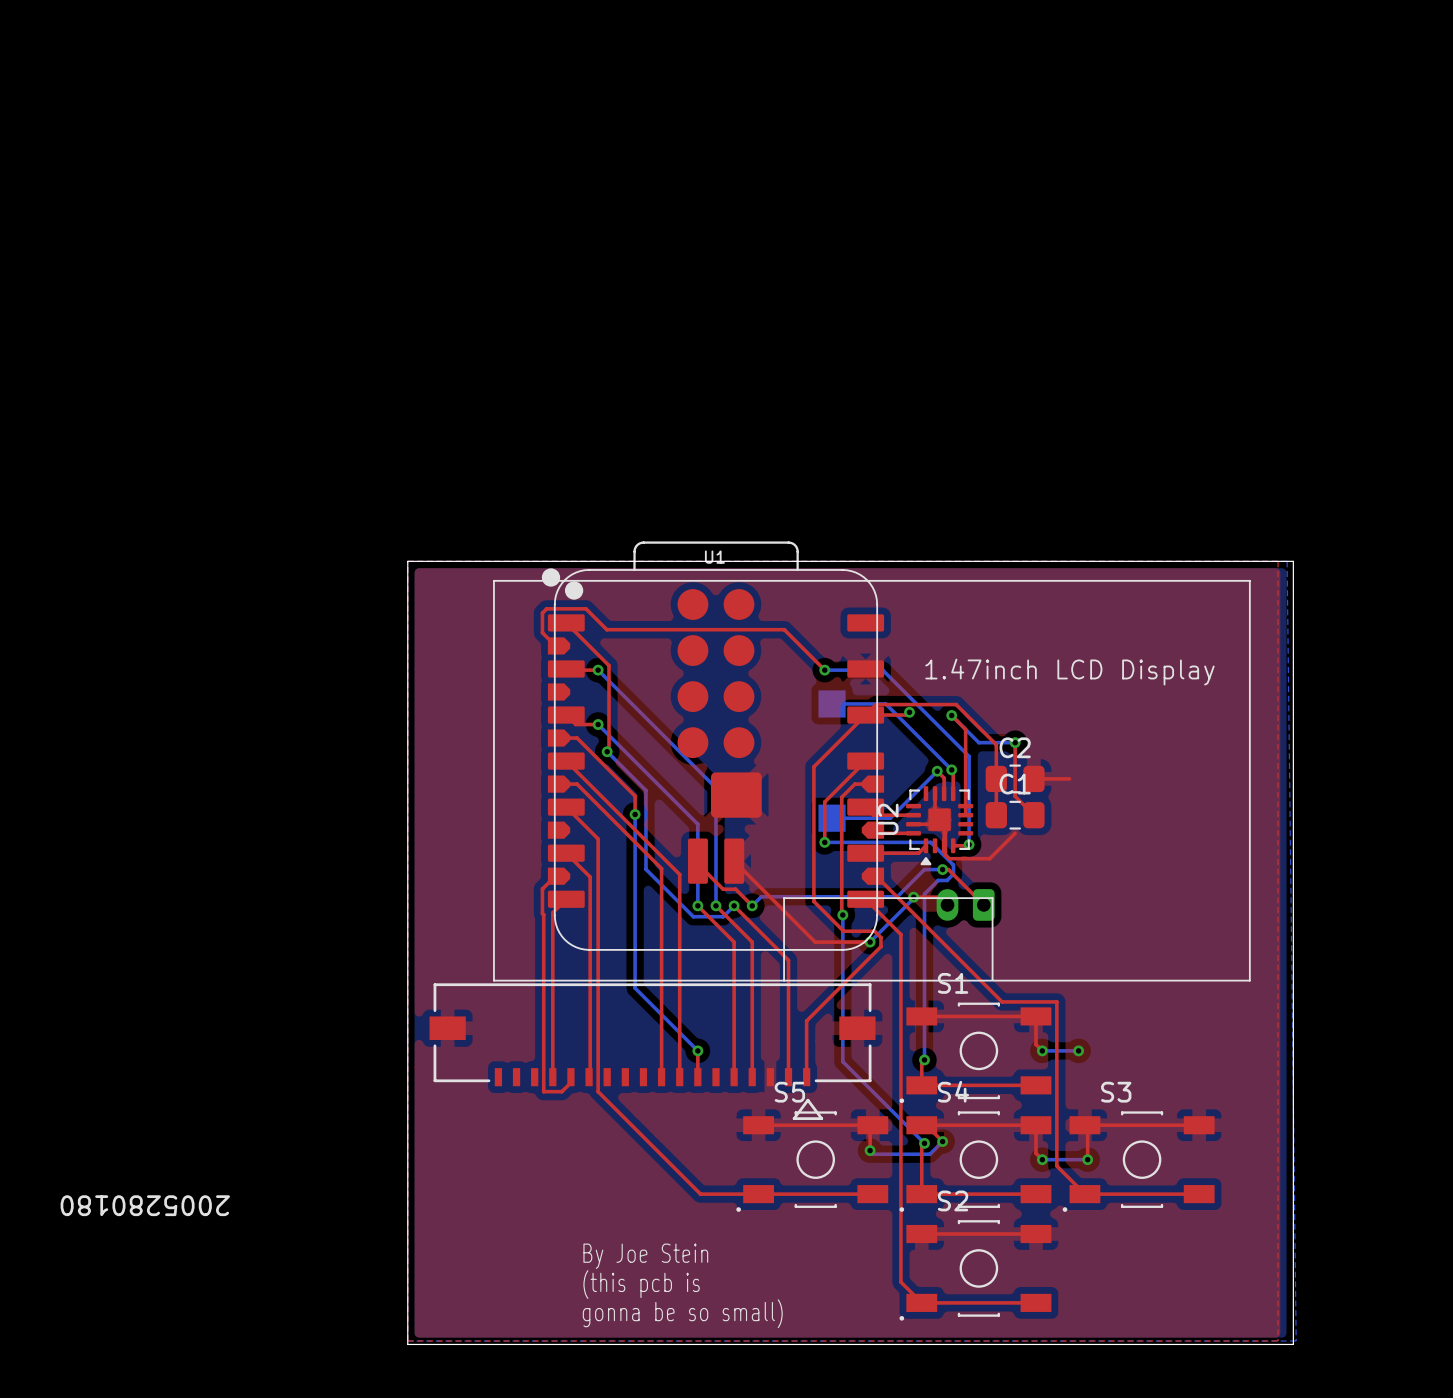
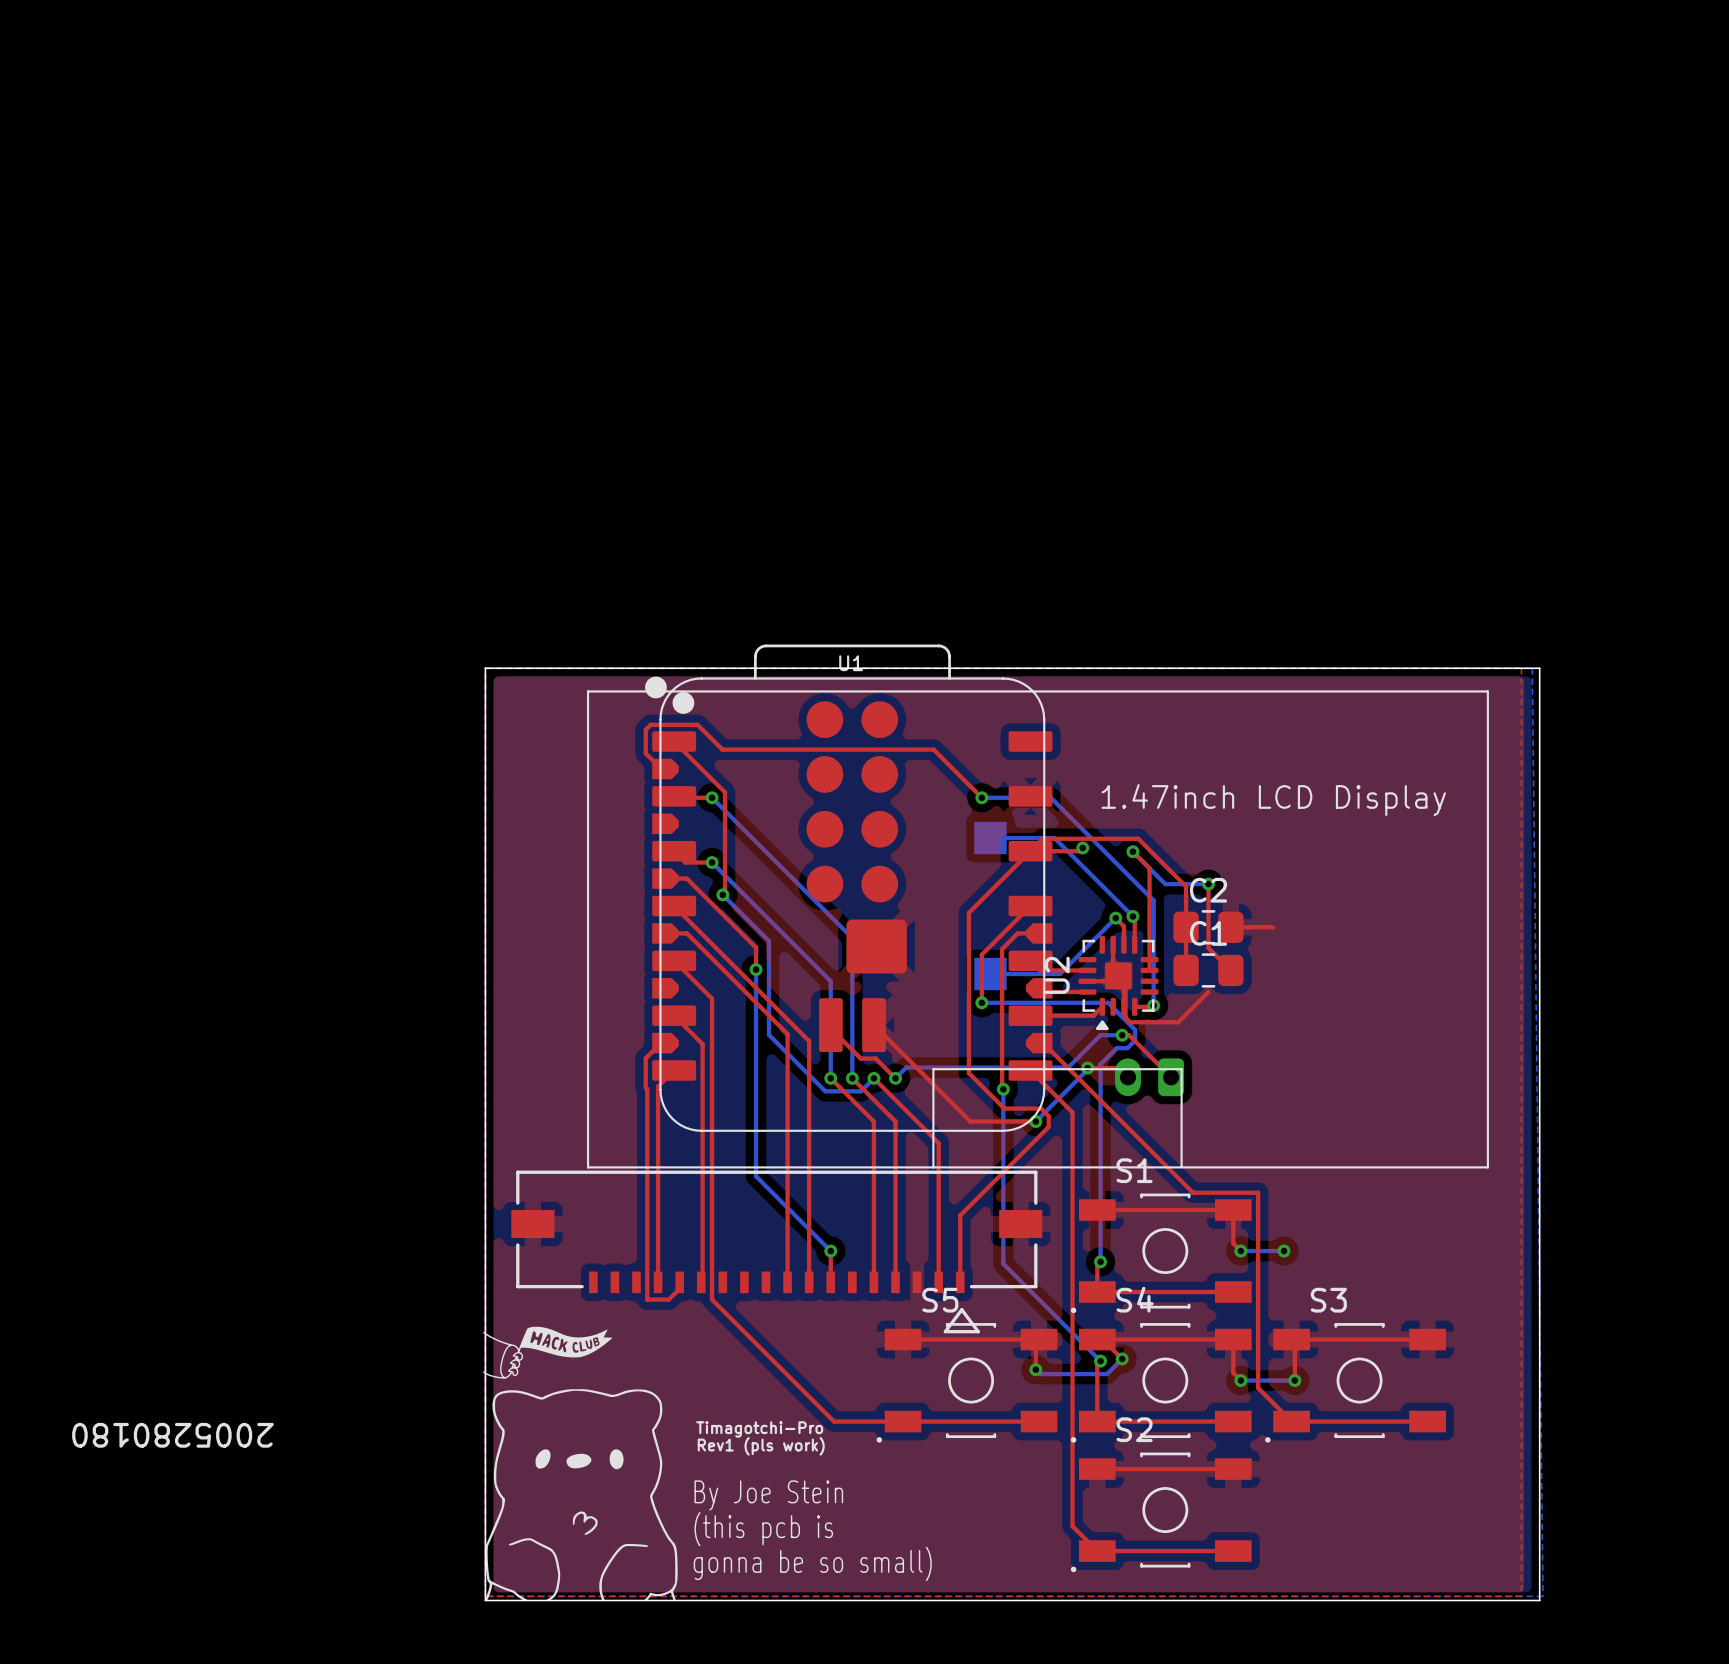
drawing: none -> [483, 1326, 678, 1601]
text: none -> Timagotchi-Pro (759, 1429)
text: none -> Rev1 (pls work) (761, 1446)

